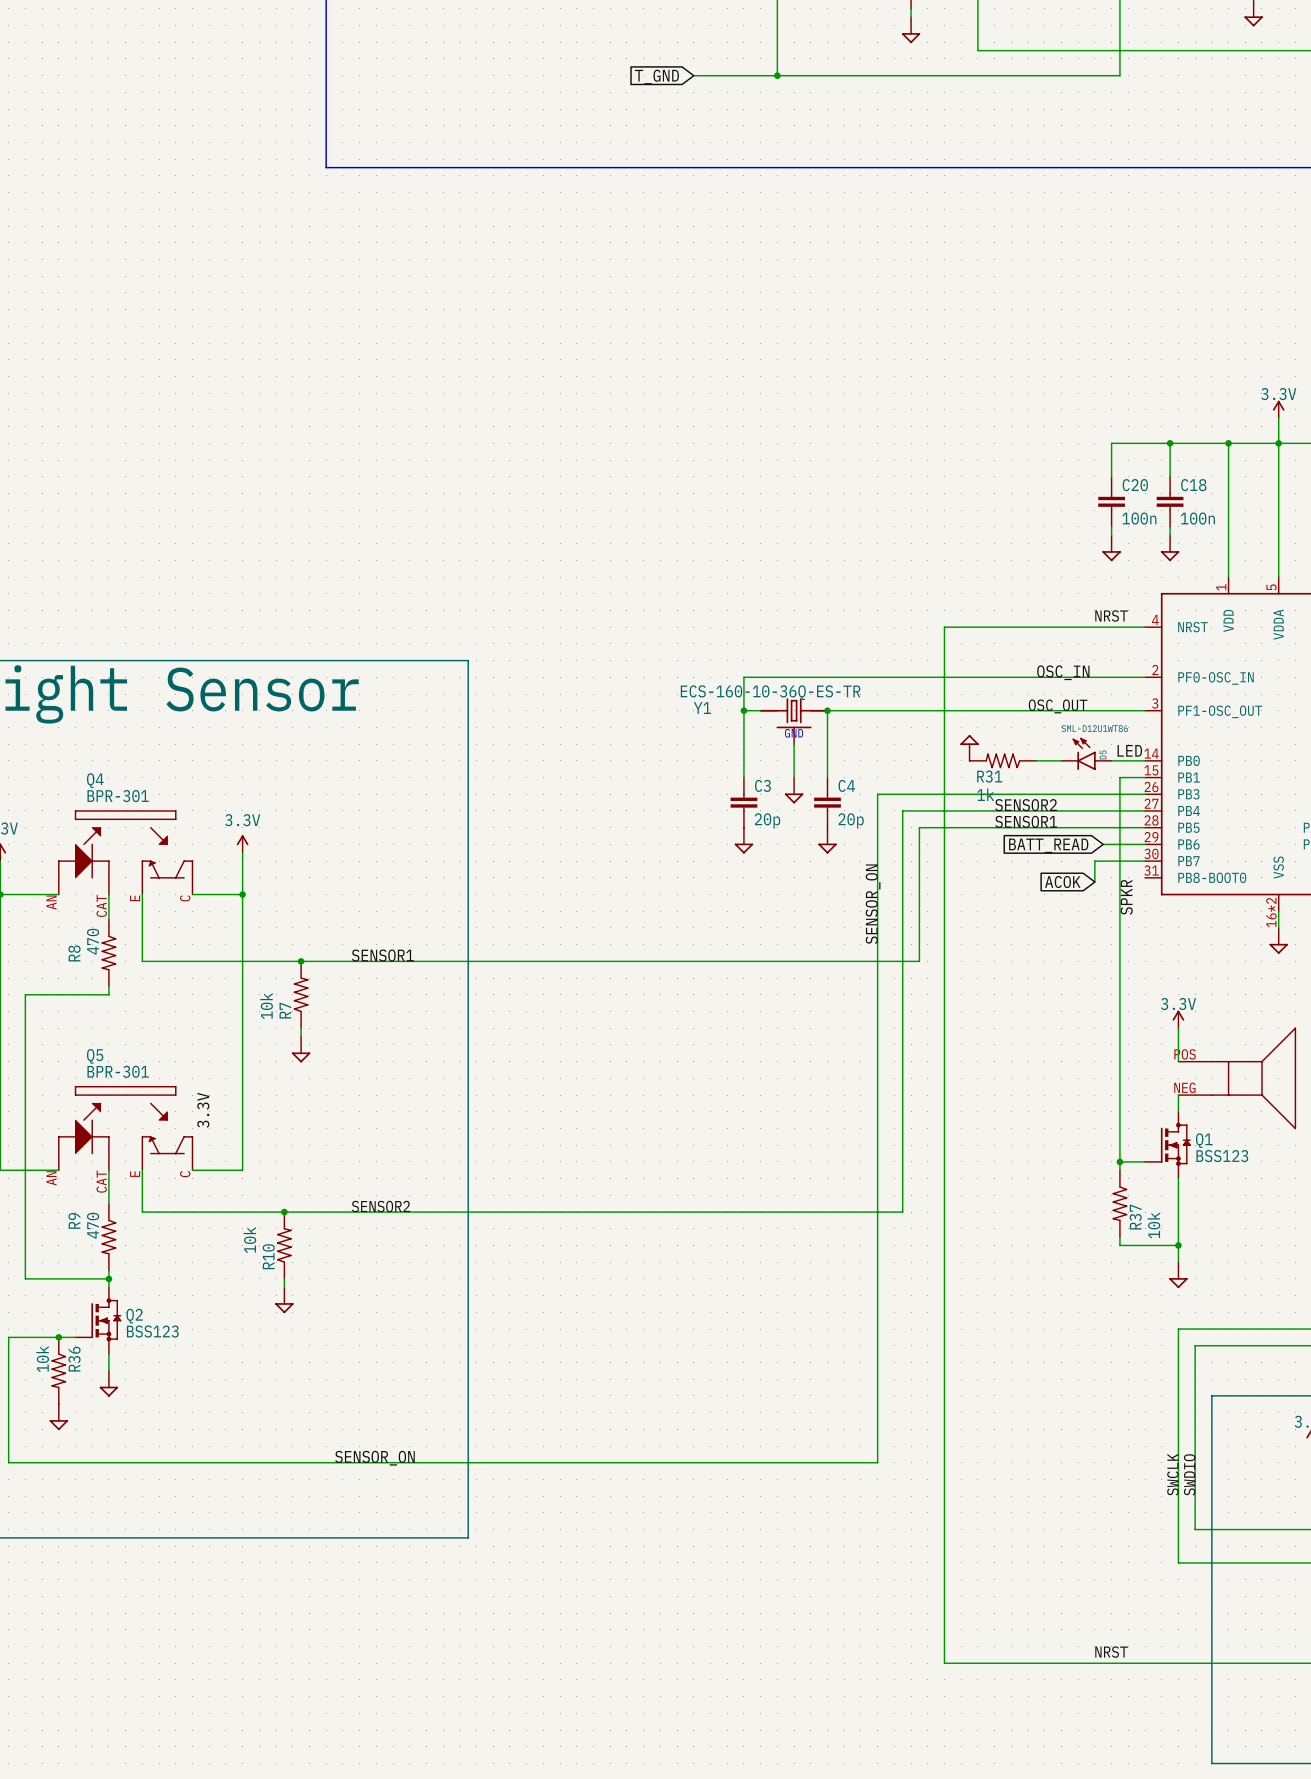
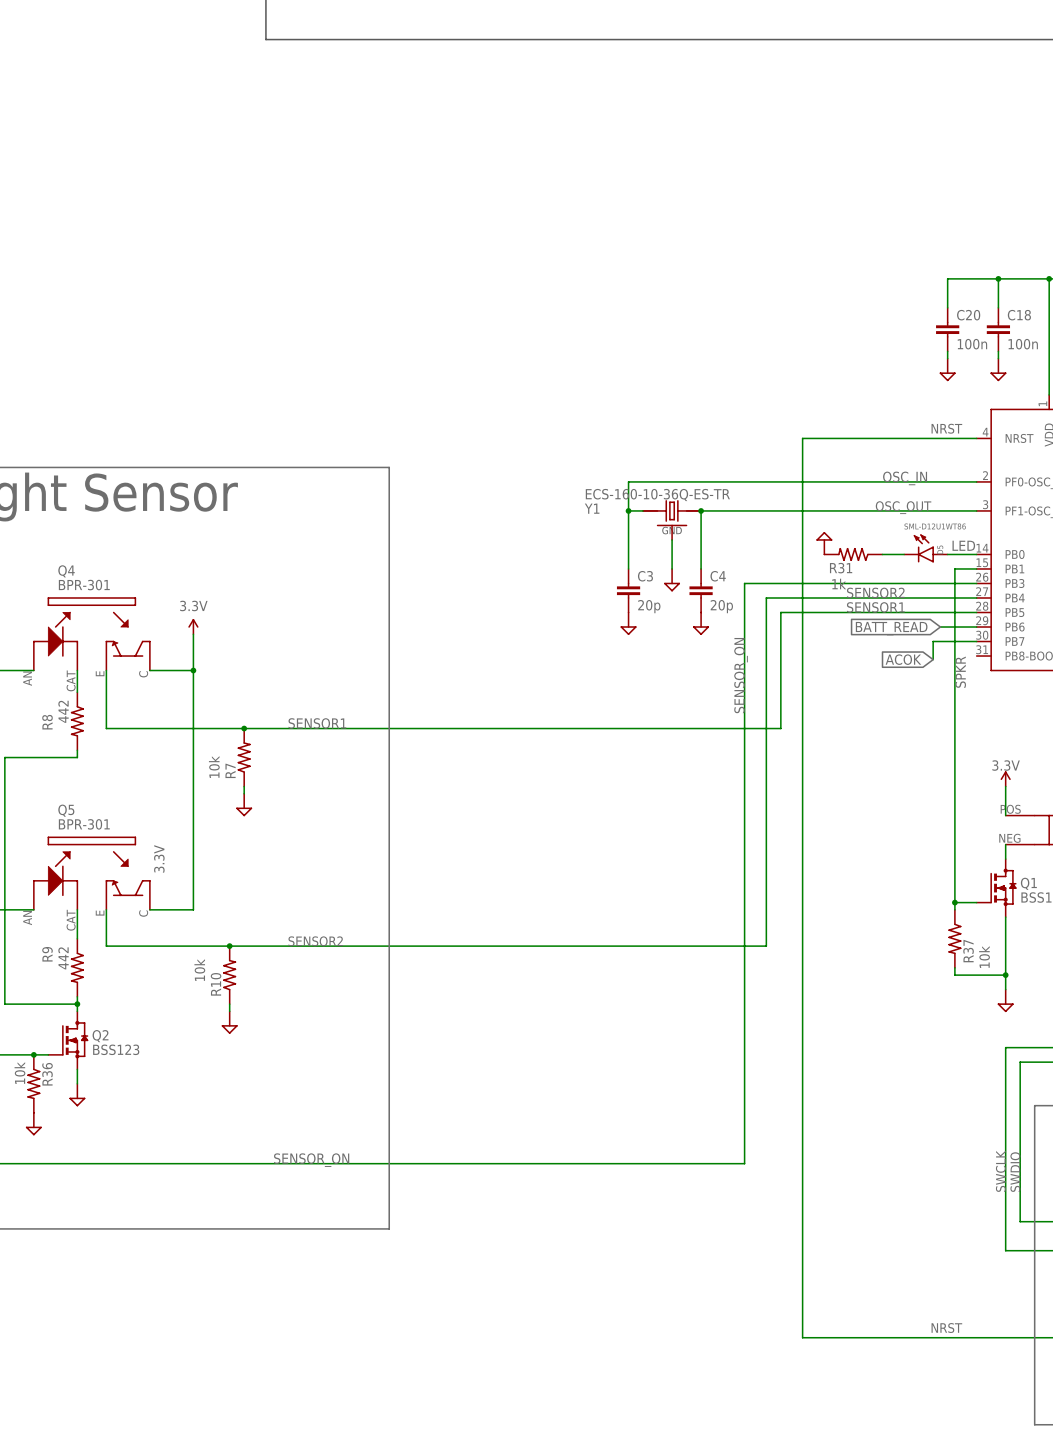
R8 value: 470 (93, 941) -> 442 (63, 711)
R9 value: 470 (93, 1225) -> 442 (63, 958)

